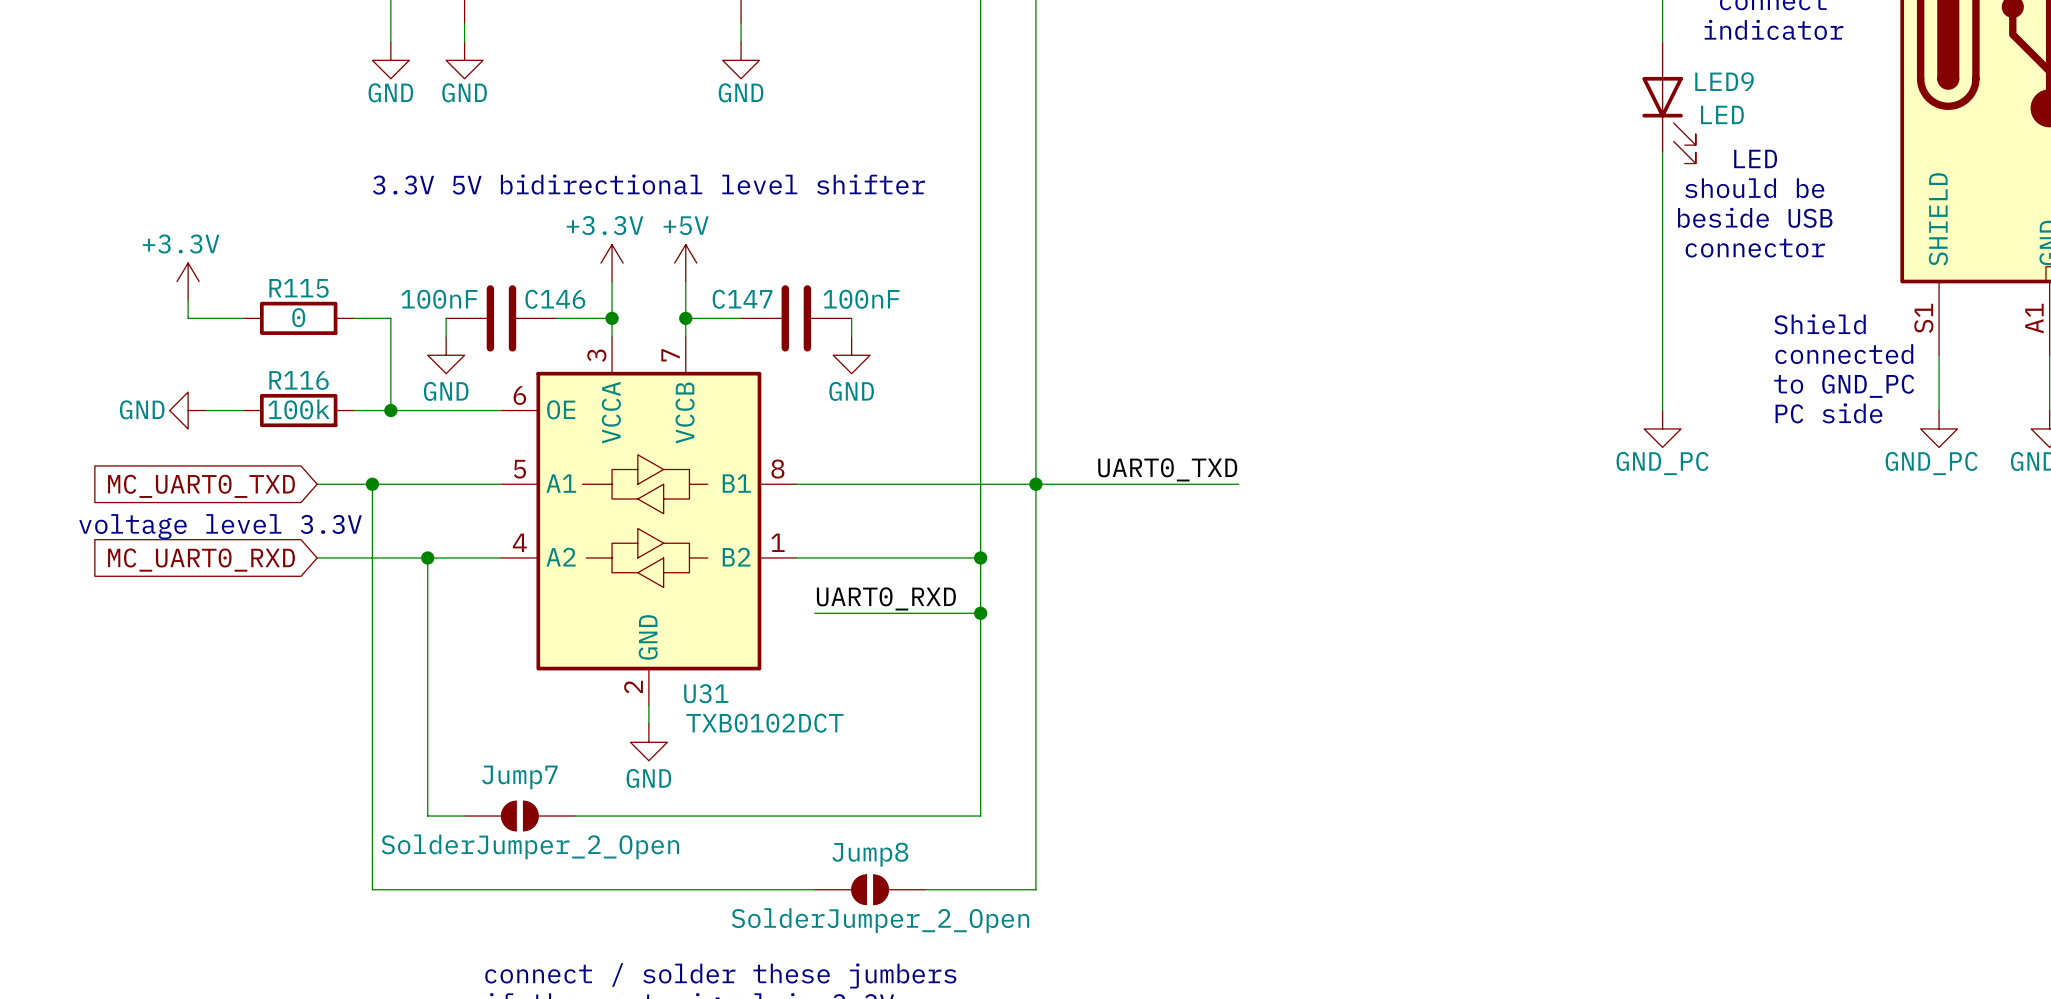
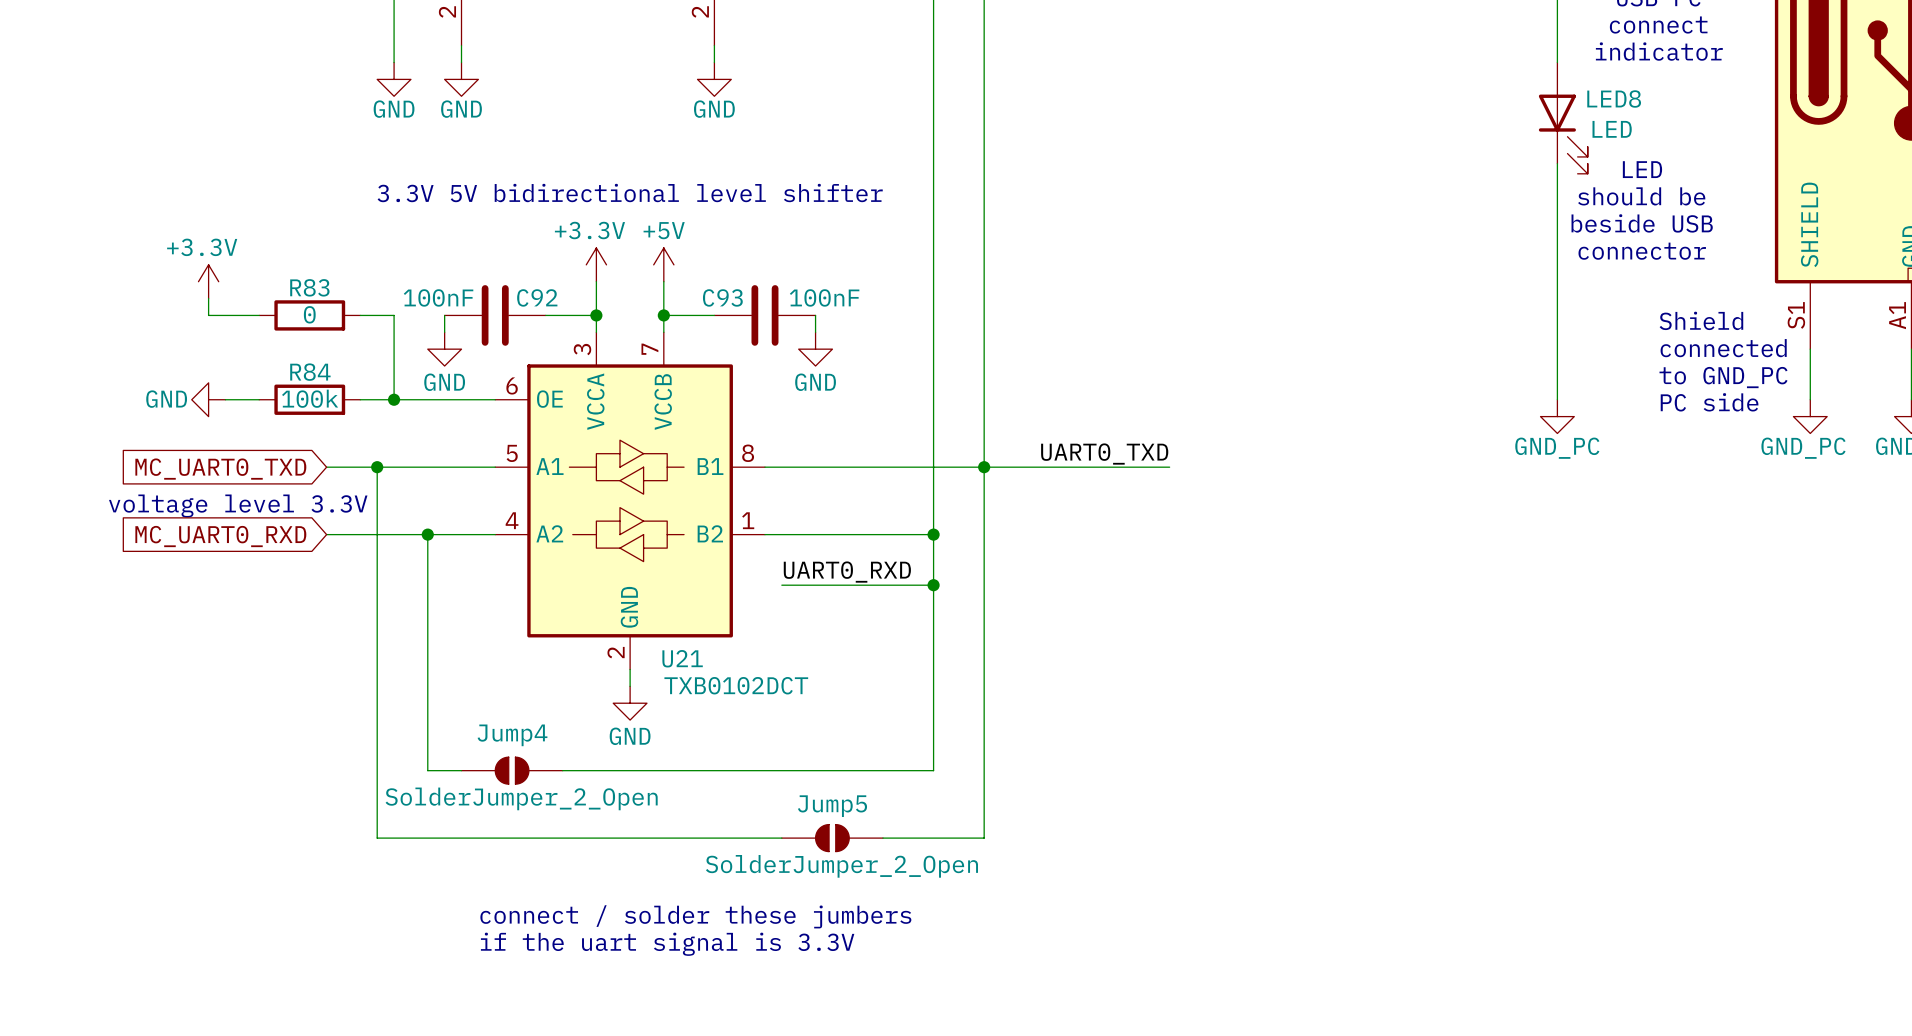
LED9 name: LED9 (1724, 81) -> LED8 (1614, 99)
R115 name: R115 (299, 288) -> R83 (309, 287)
C146 name: C146 (555, 299) -> C92 (537, 297)
C147 name: C147 (742, 299) -> C93 (722, 297)
R116 name: R116 (299, 380) -> R84 (310, 372)
U31 name: U31 (706, 693) -> U21 (682, 658)
Jump7 name: Jump7 (519, 777) -> Jump4 (512, 735)
Jump8 name: Jump8 (870, 854) -> Jump5 (832, 806)

